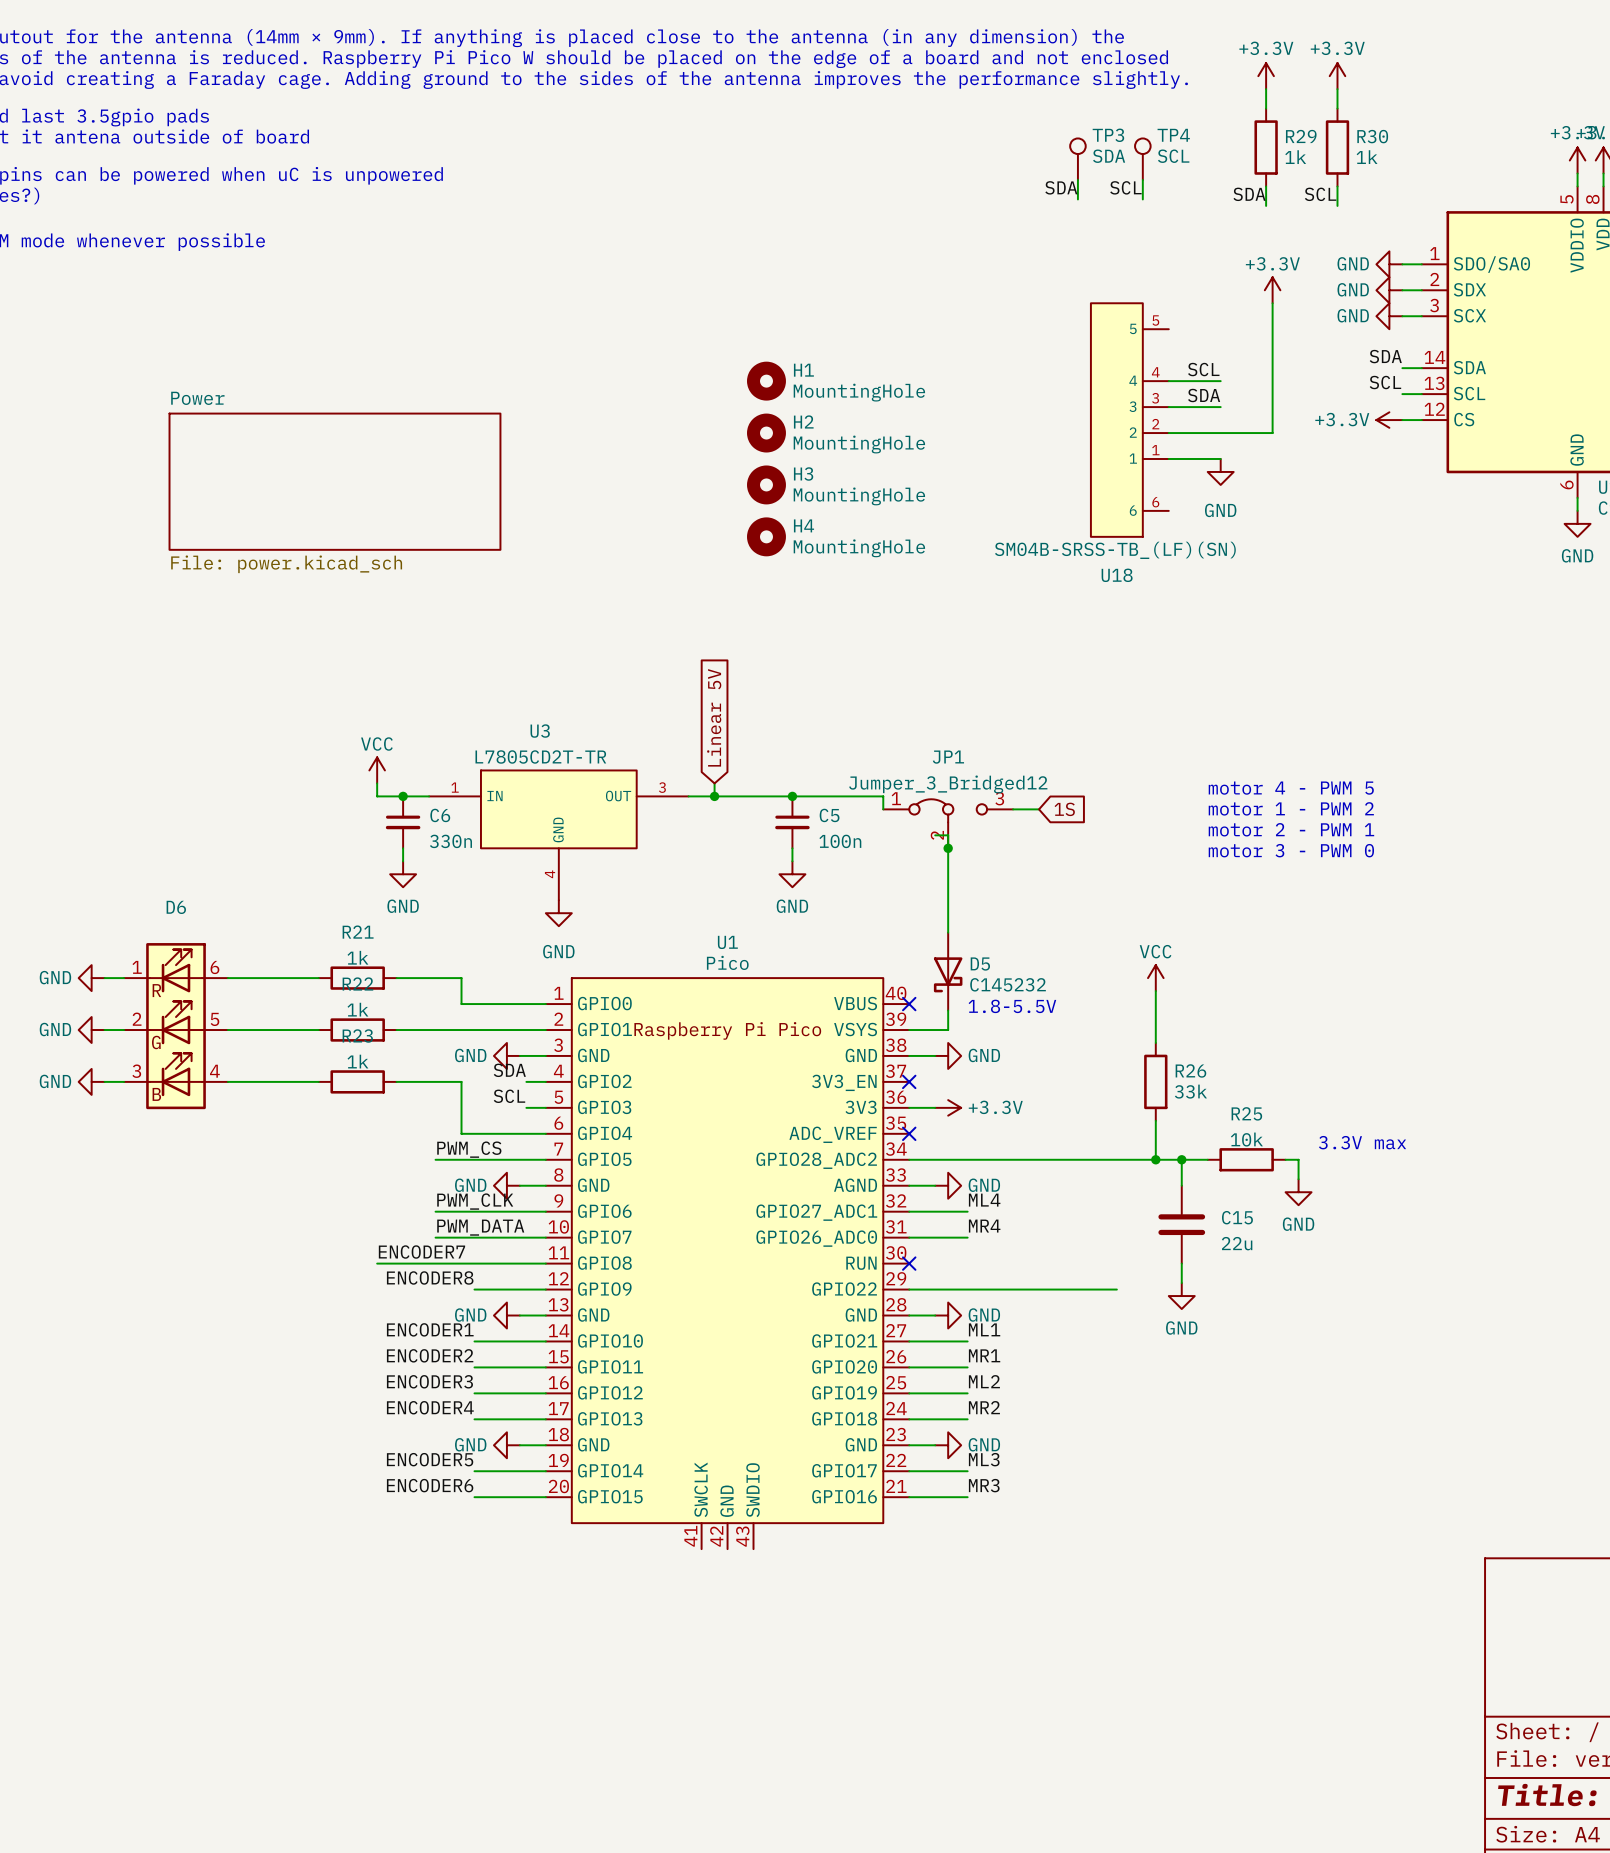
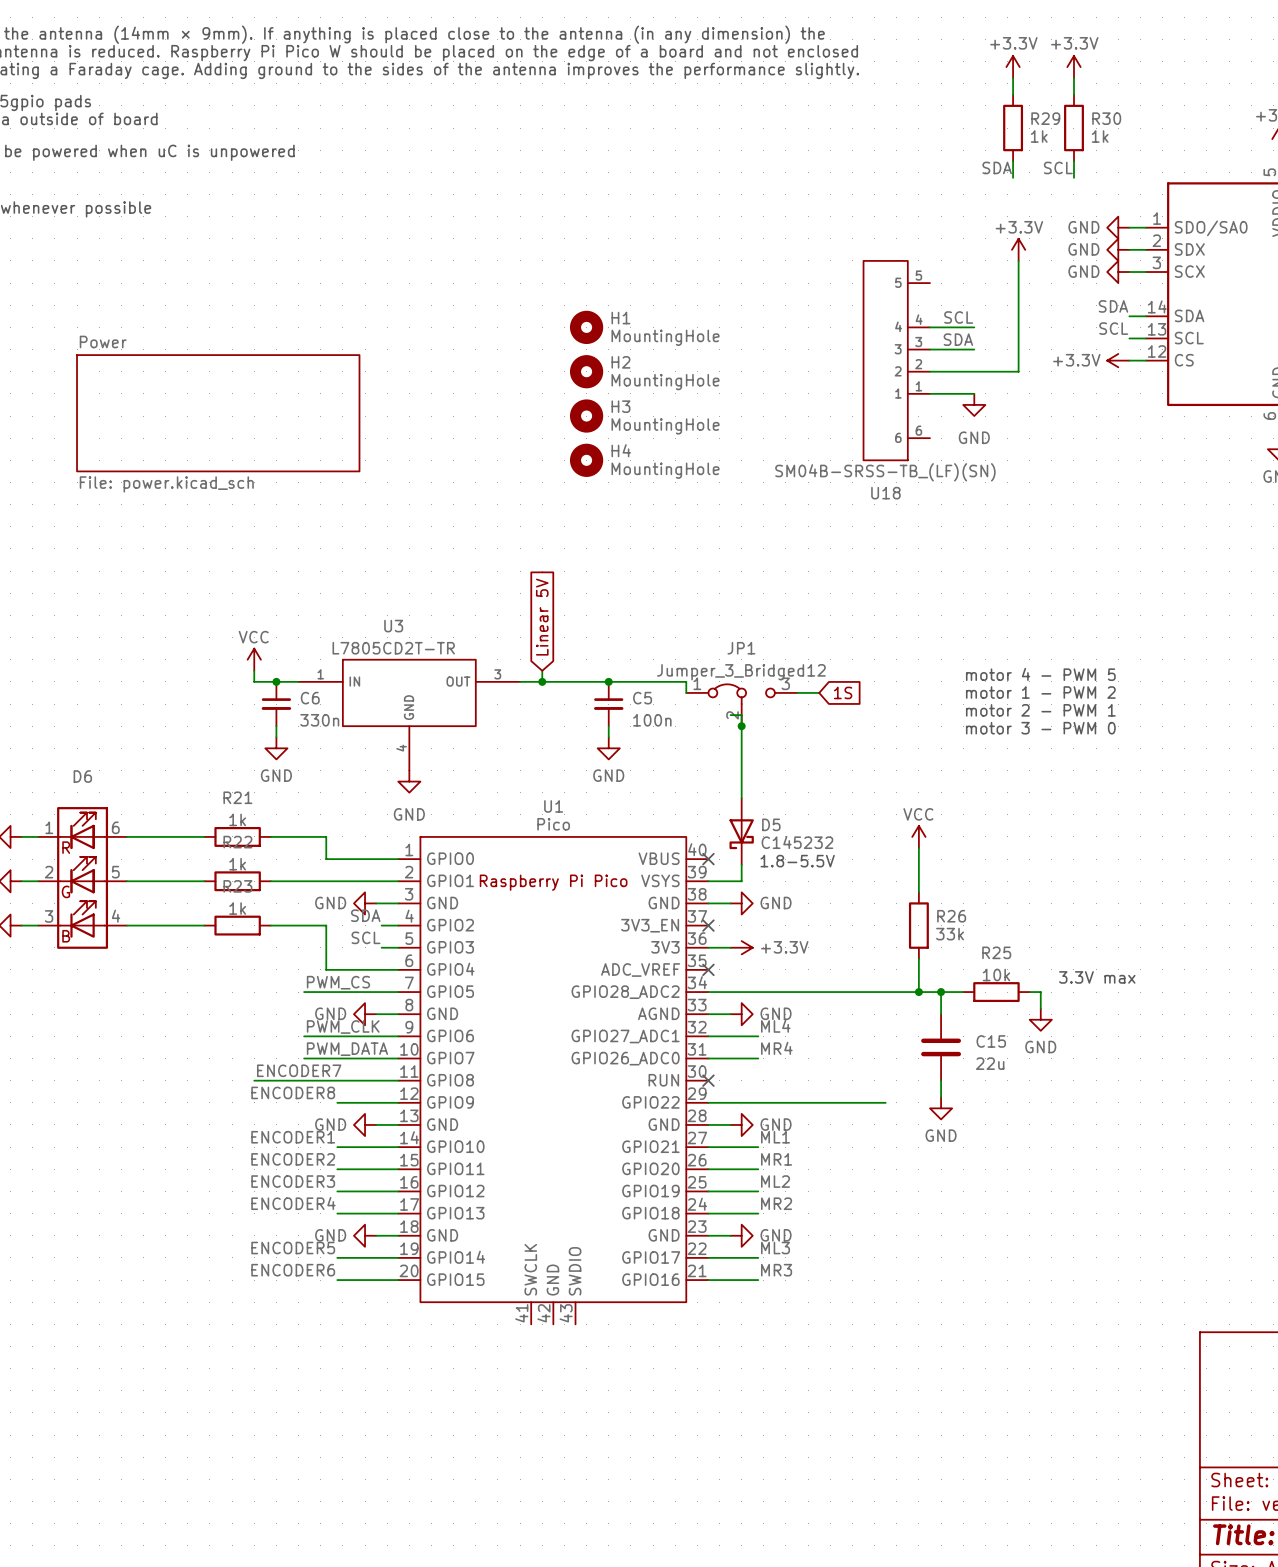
TP3: SDA (1077, 159) -> none
TP4: SCL (1142, 159) -> none
wire: (1077, 179) (1077, 199) -> none
wire: (1142, 179) (1142, 199) -> none
label: SDA (1061, 187) -> none
label: SCL (1125, 187) -> none

